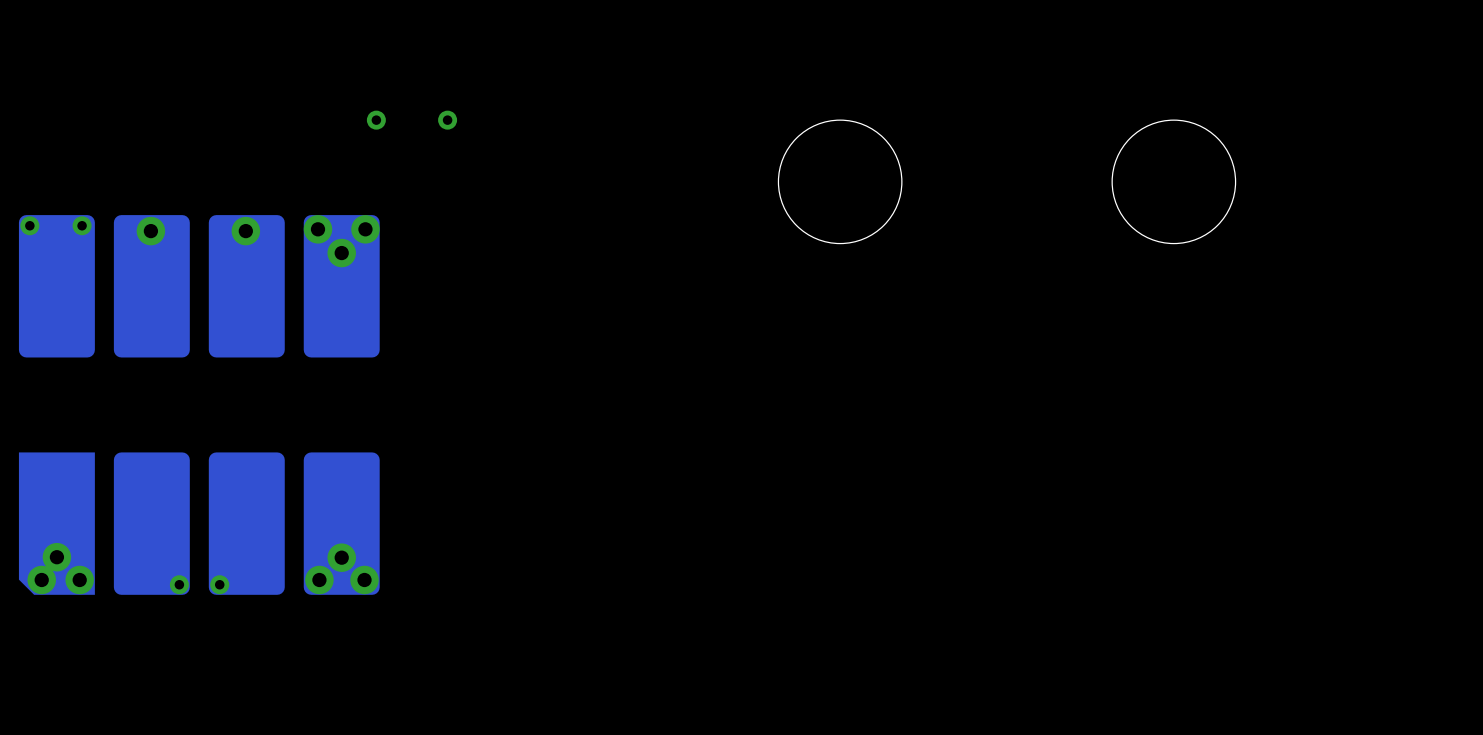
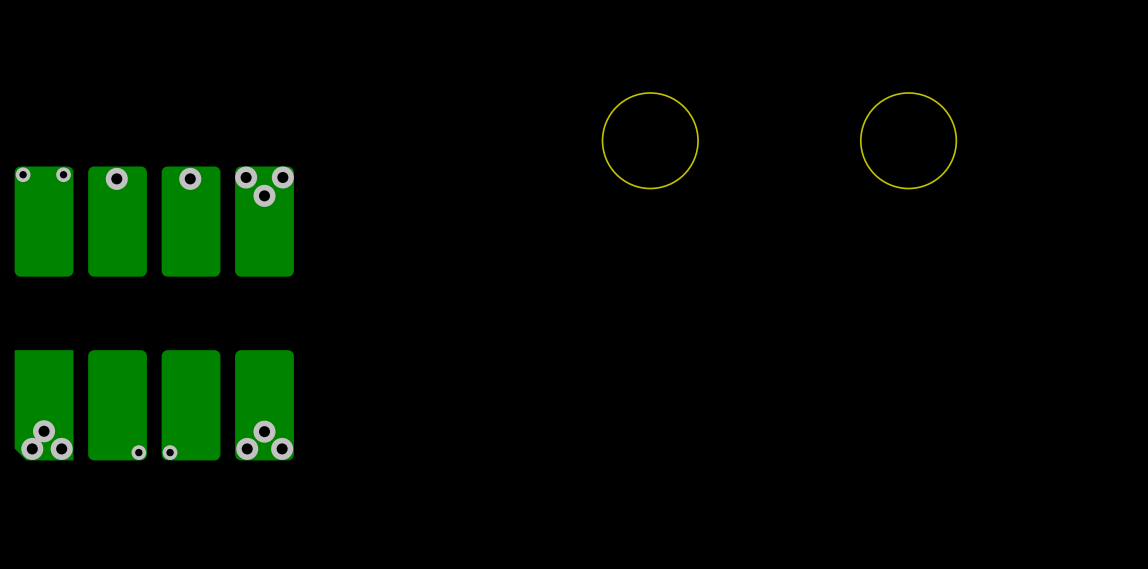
via: (376, 120) -> none
via: (447, 120) -> none

